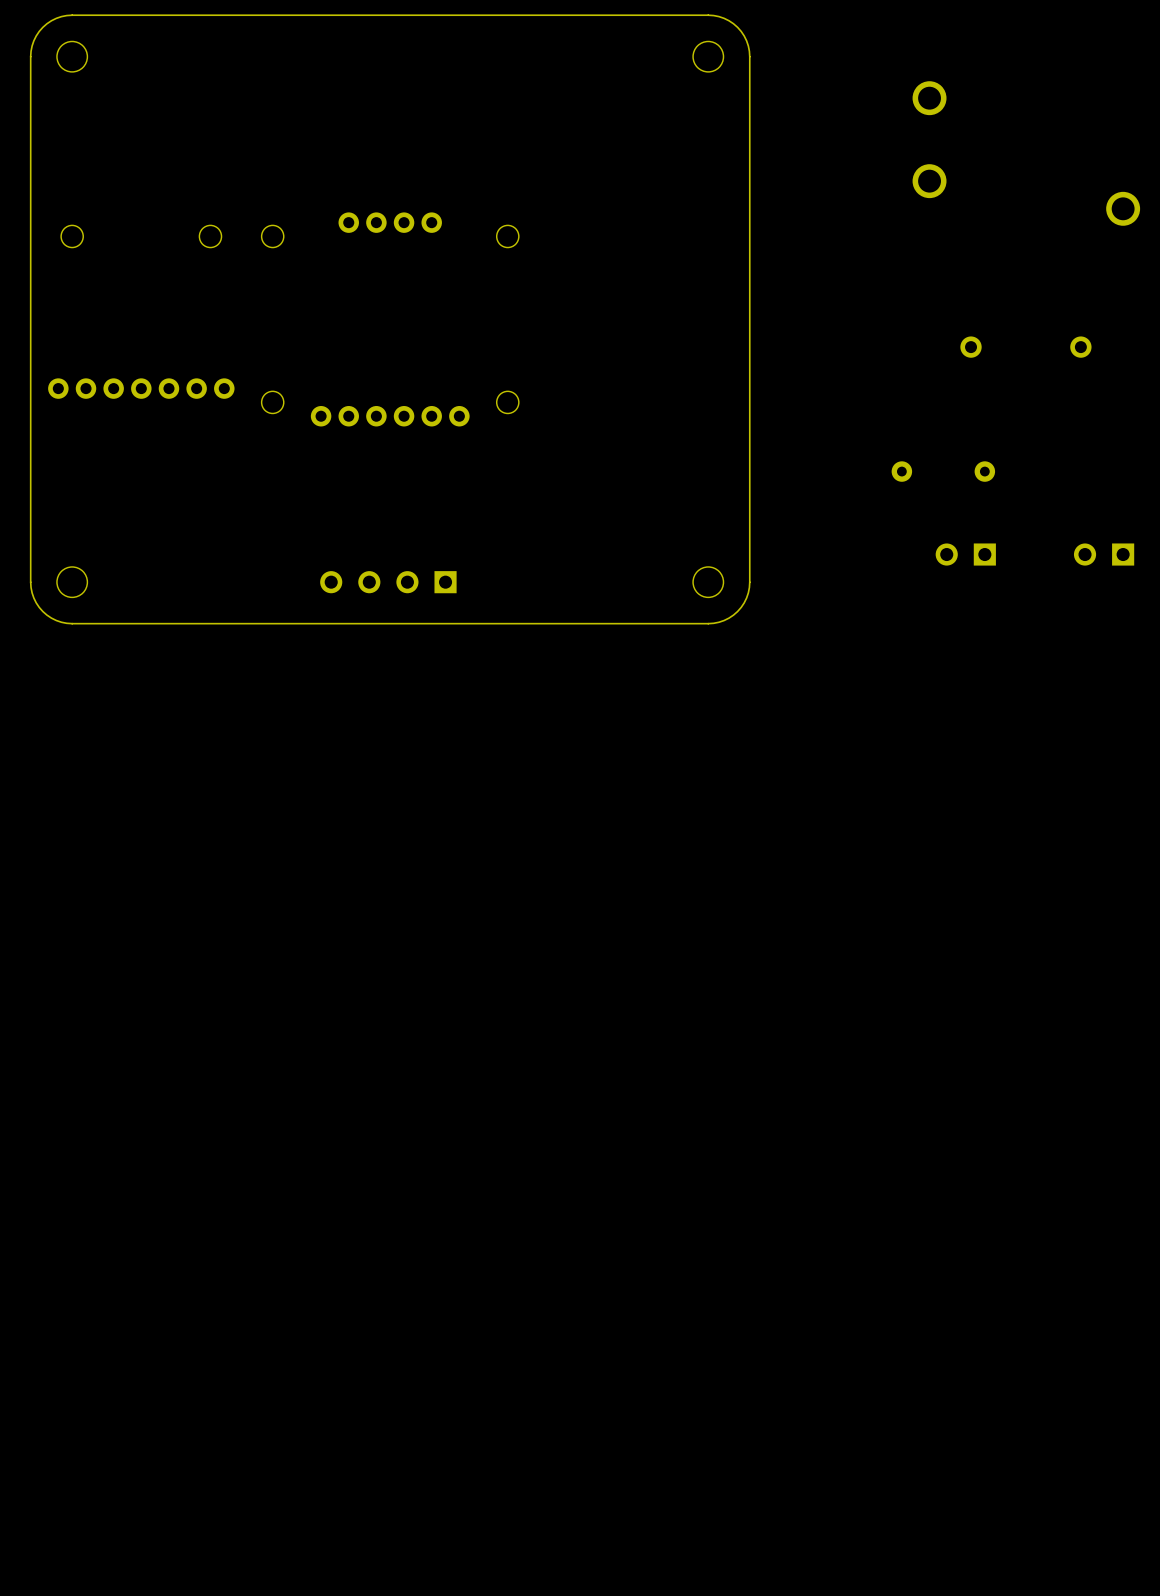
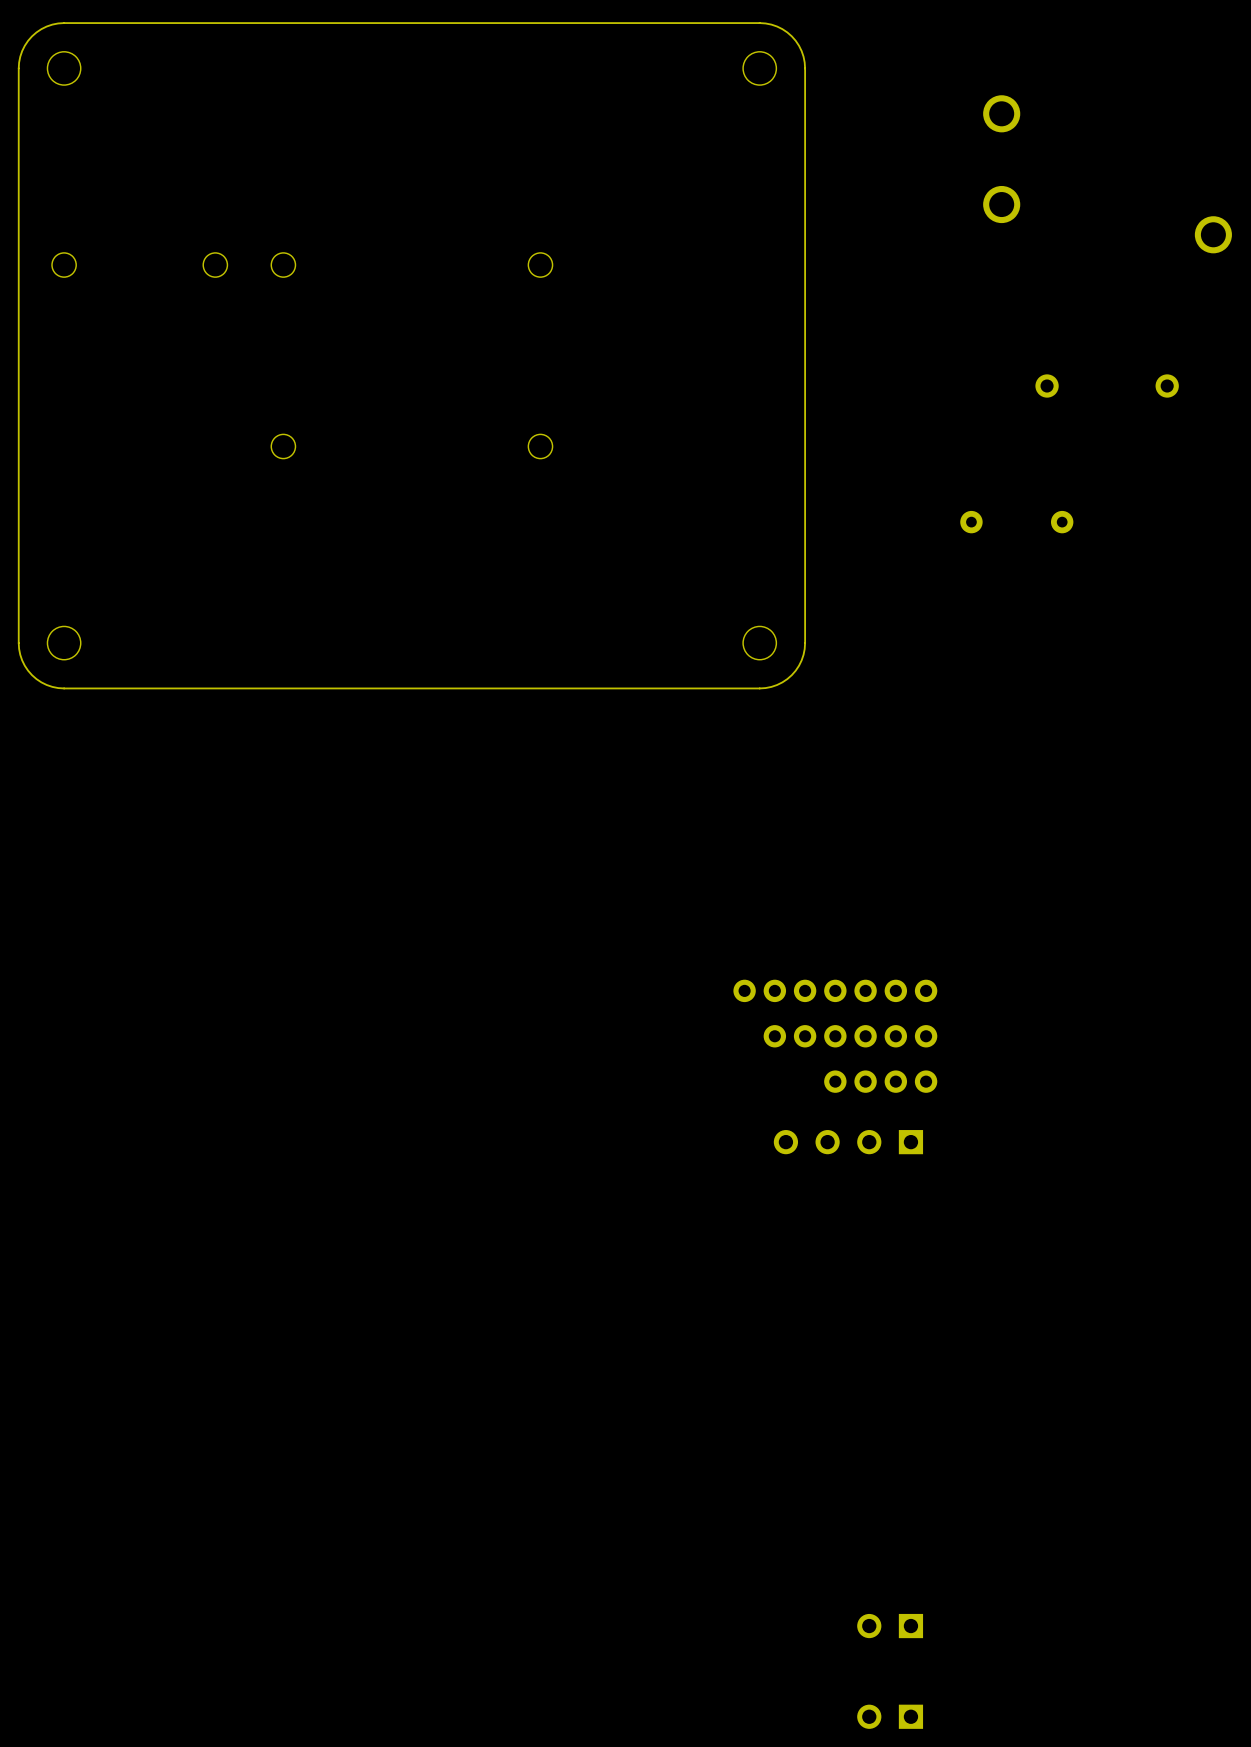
part: (390, 222) -> none
part: (141, 388) -> none
part: (390, 416) -> none
part: (965, 554) -> none
part: (1104, 554) -> none
part: (388, 582) -> none
part: none -> (835, 990)
part: none -> (850, 1036)
part: none -> (880, 1081)
part: none -> (848, 1142)
part: none -> (890, 1626)
part: none -> (890, 1716)

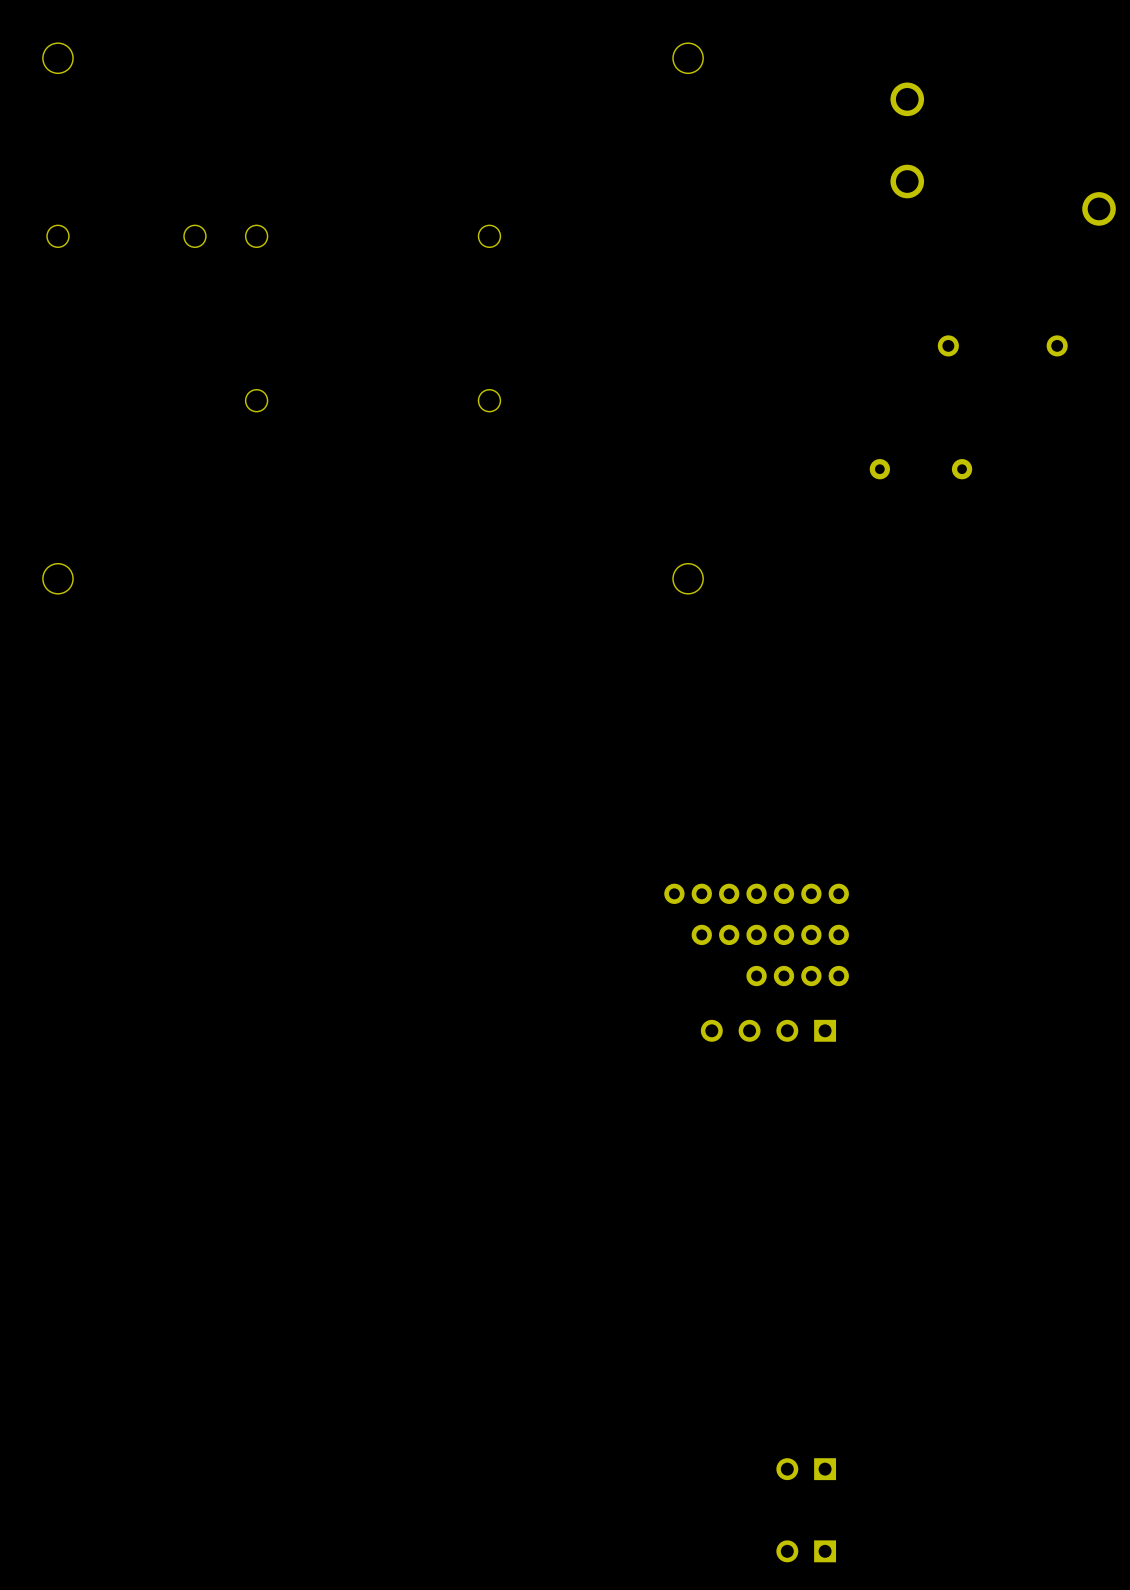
board edge: (759, 23) (64, 23) (46, 26) (32, 36) (22, 51) (18, 68) (18, 643) (22, 660) (32, 675) (46, 684) (64, 688) (759, 688) (777, 684) (791, 675) (801, 660) (805, 643) (805, 68) (801, 51) (791, 36) (777, 26) (759, 23) -> none

